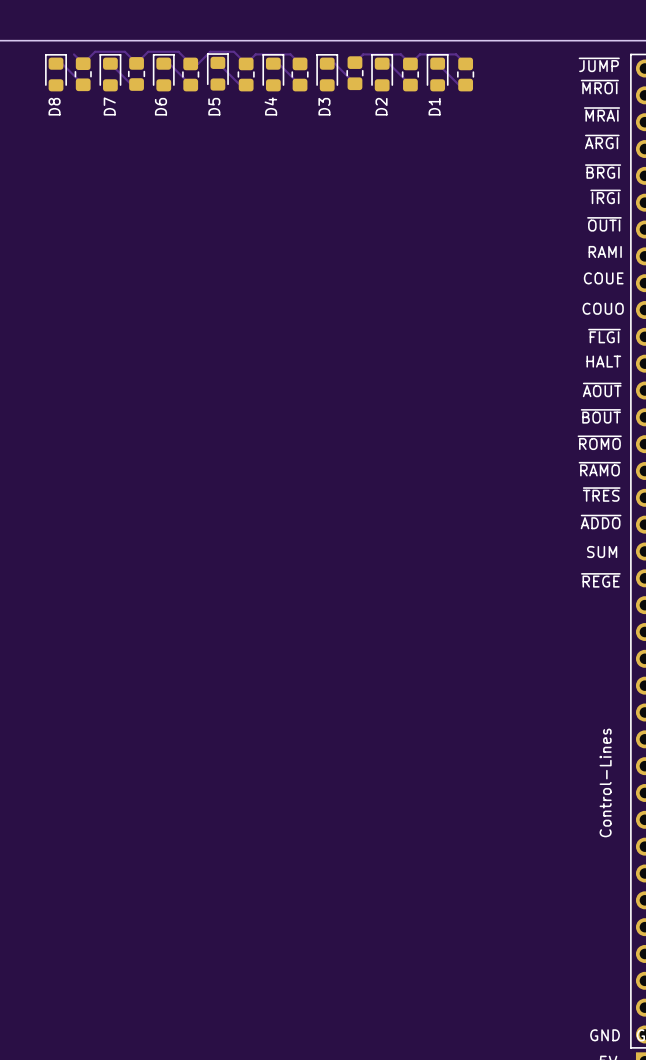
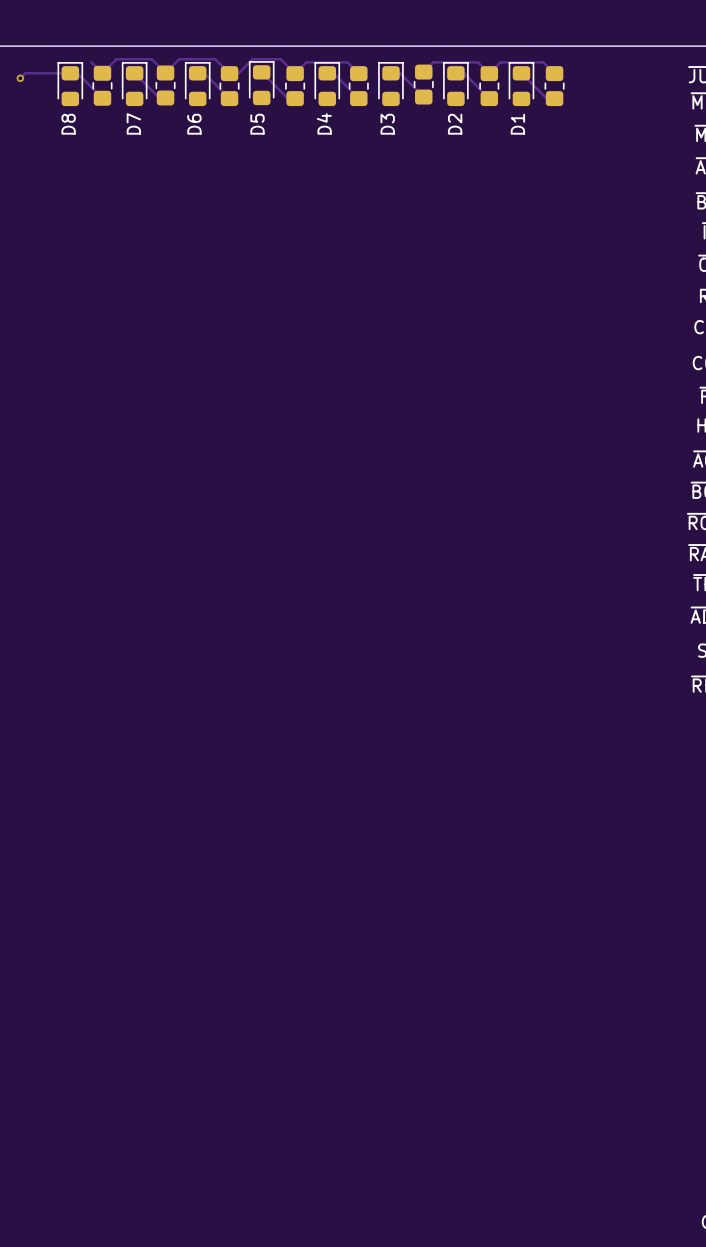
track: none -> (70, 73) (25, 73) (20, 78)
via: none -> (20, 78)

